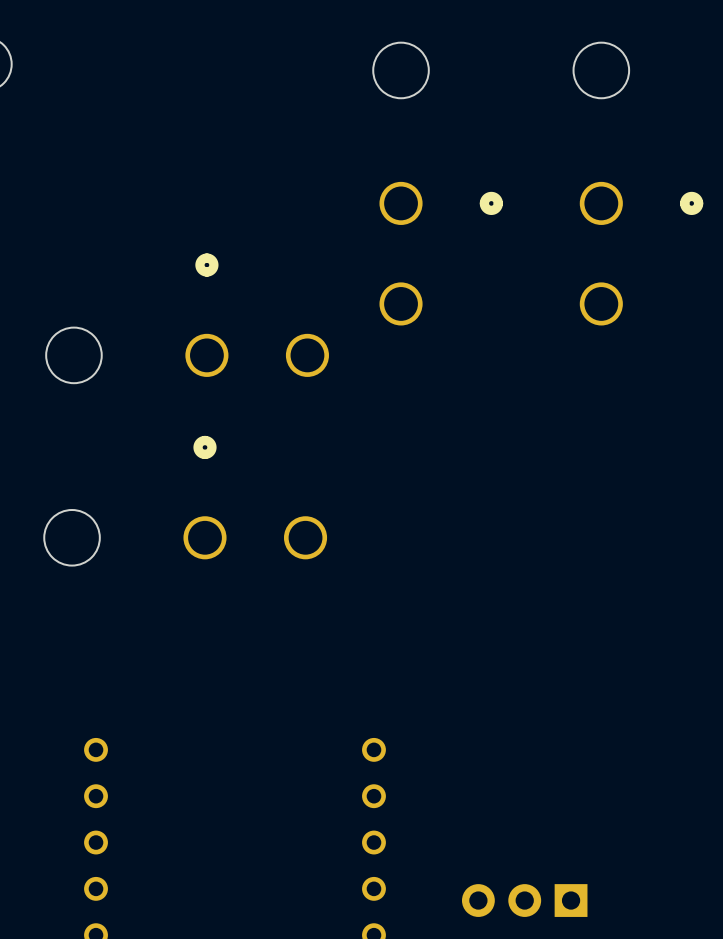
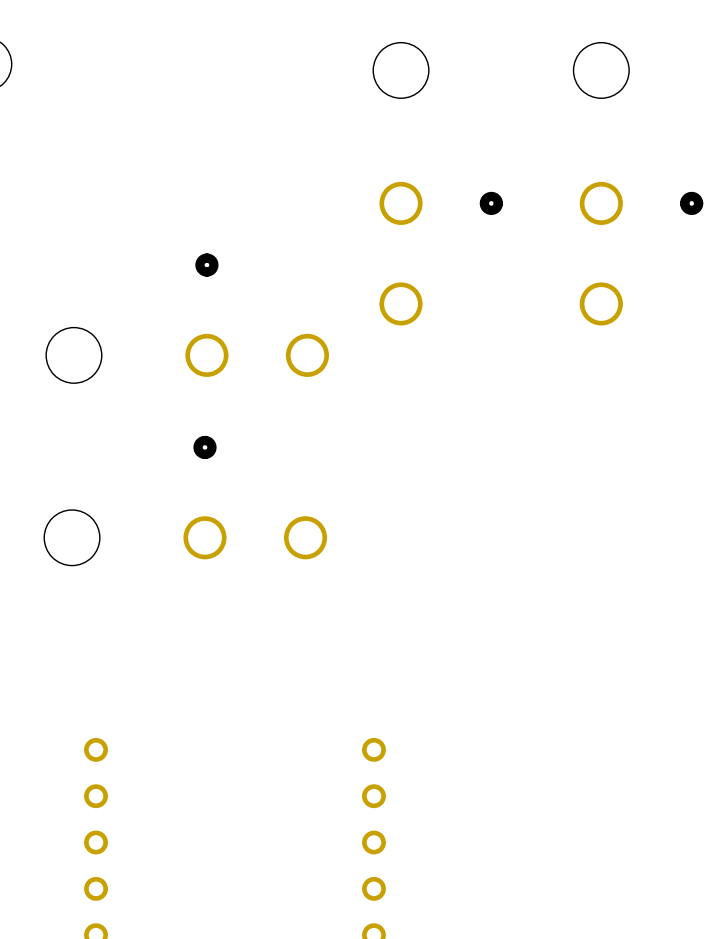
part: (524, 900) -> none

